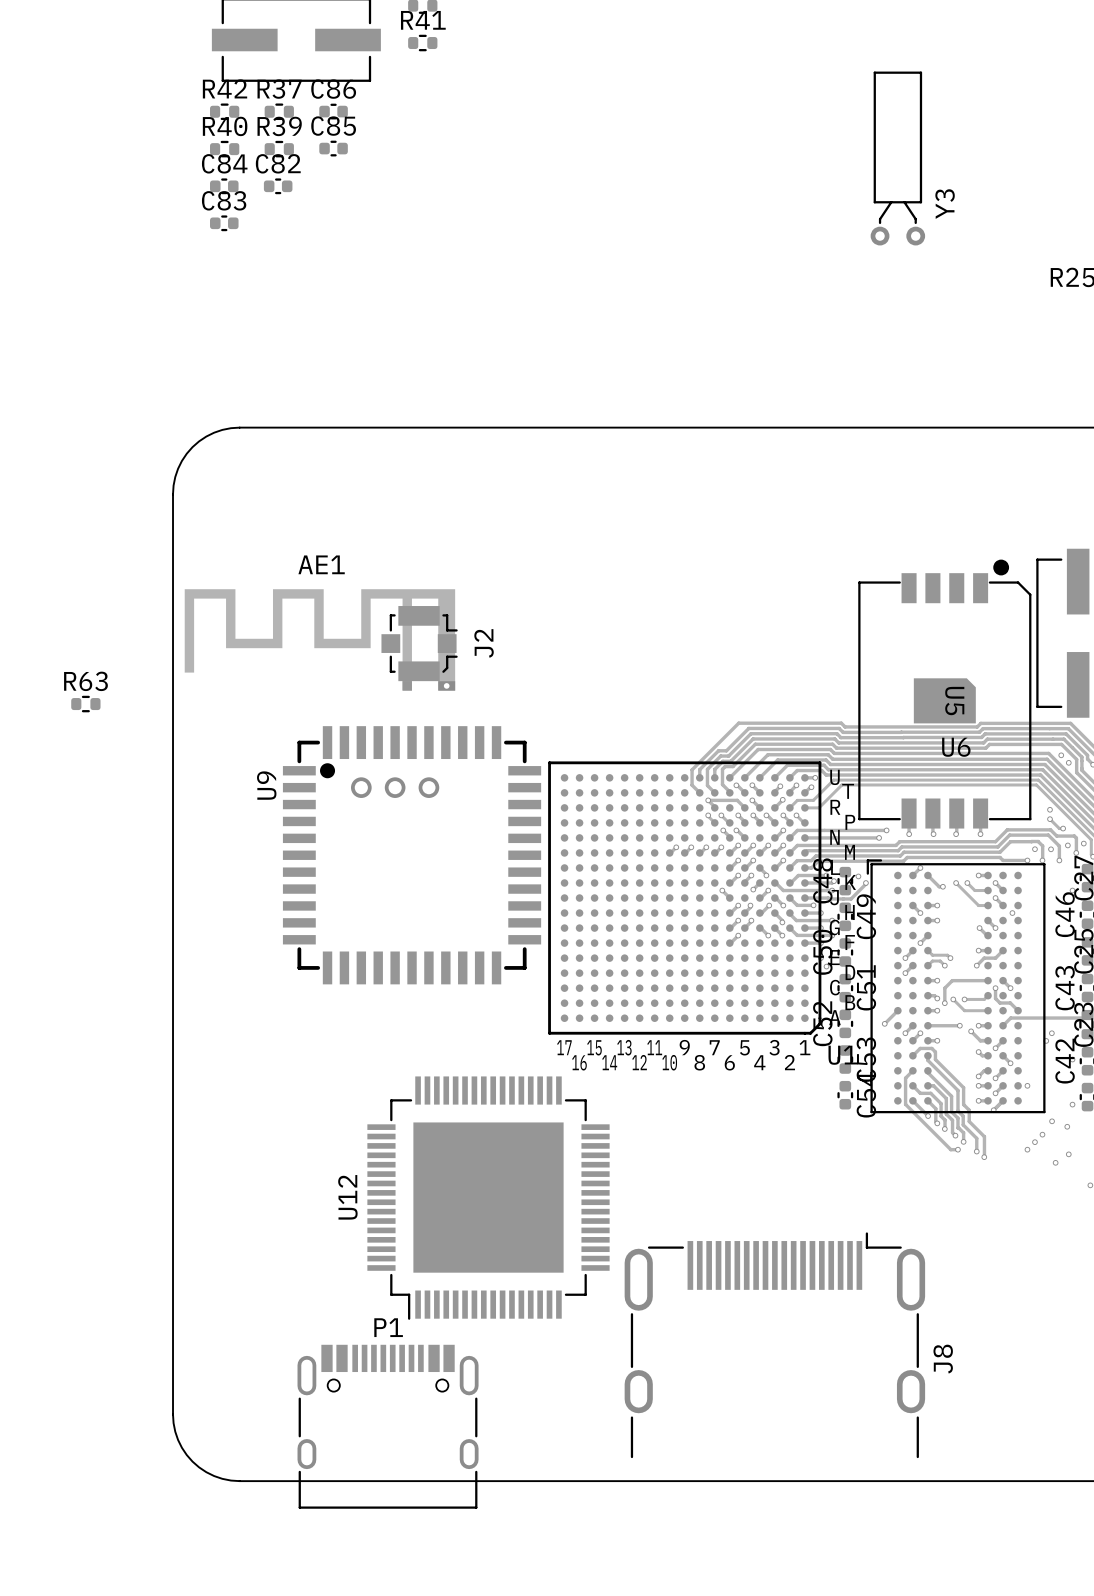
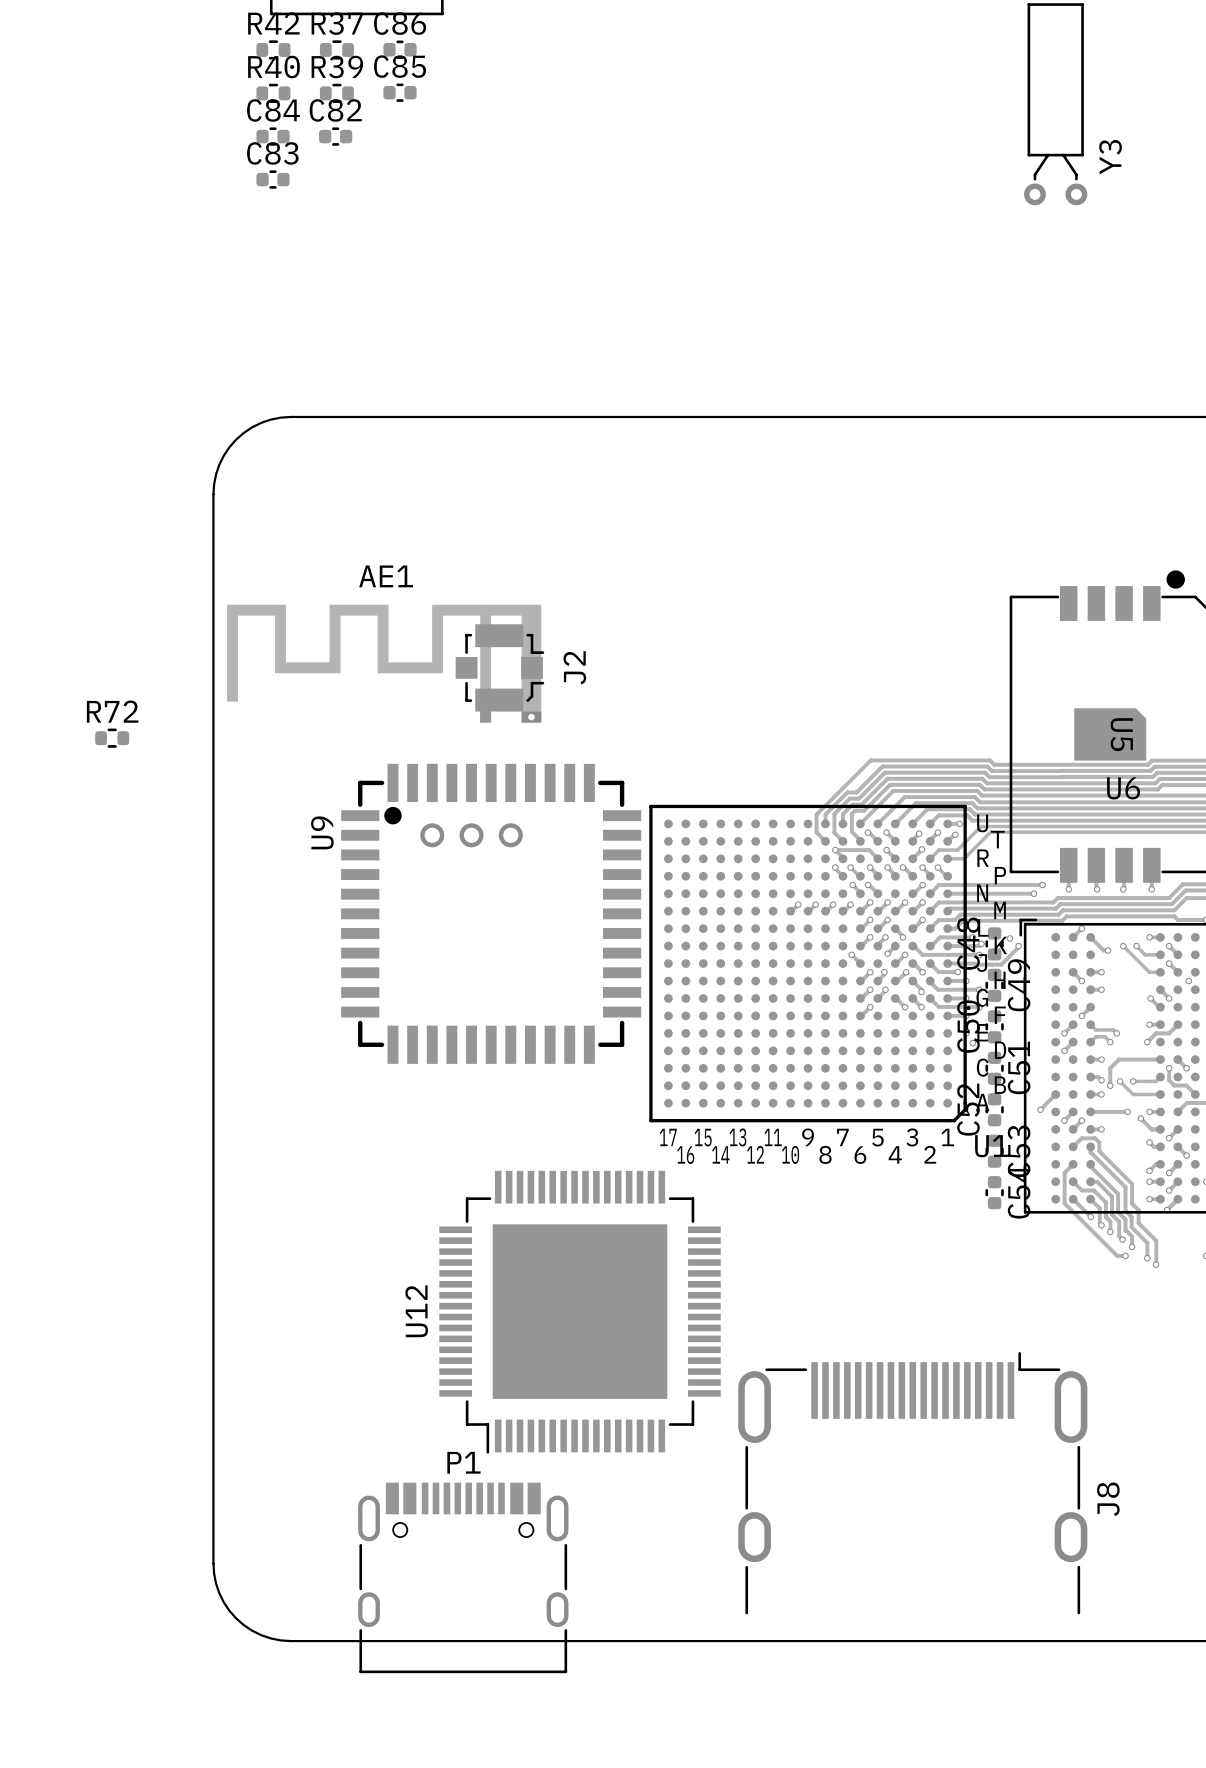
R63 name: R63 (85, 681) -> R72 (112, 711)

